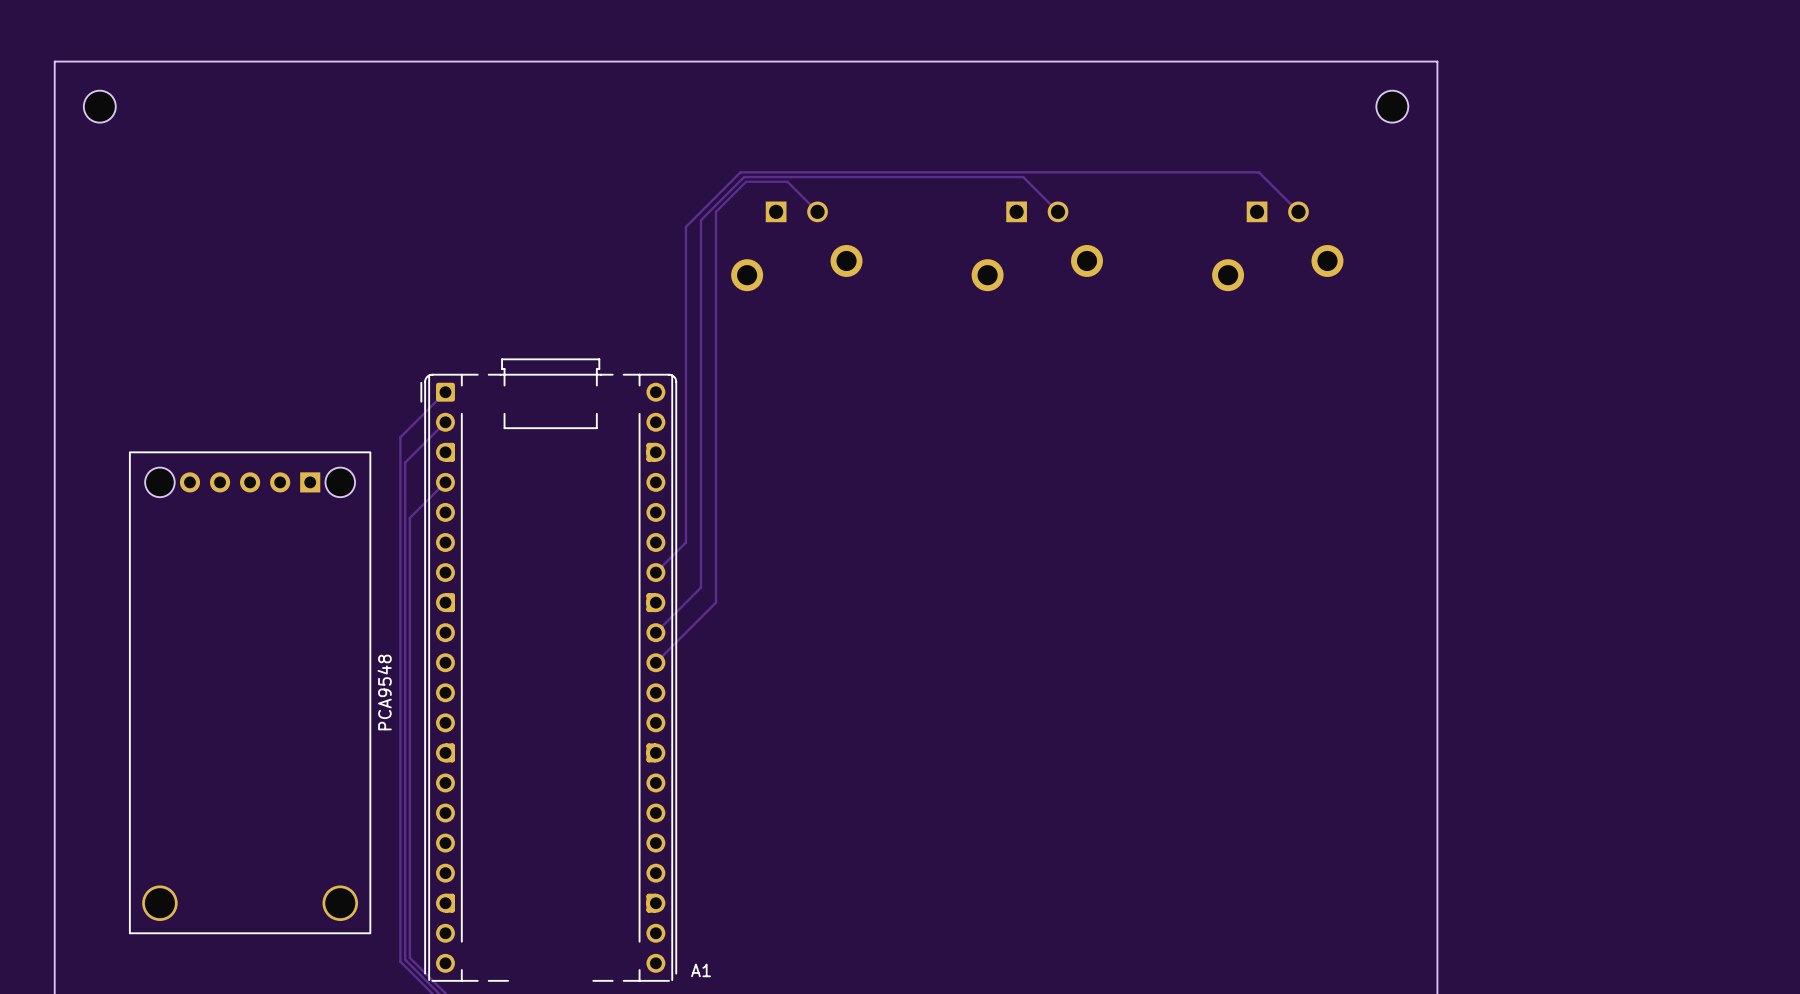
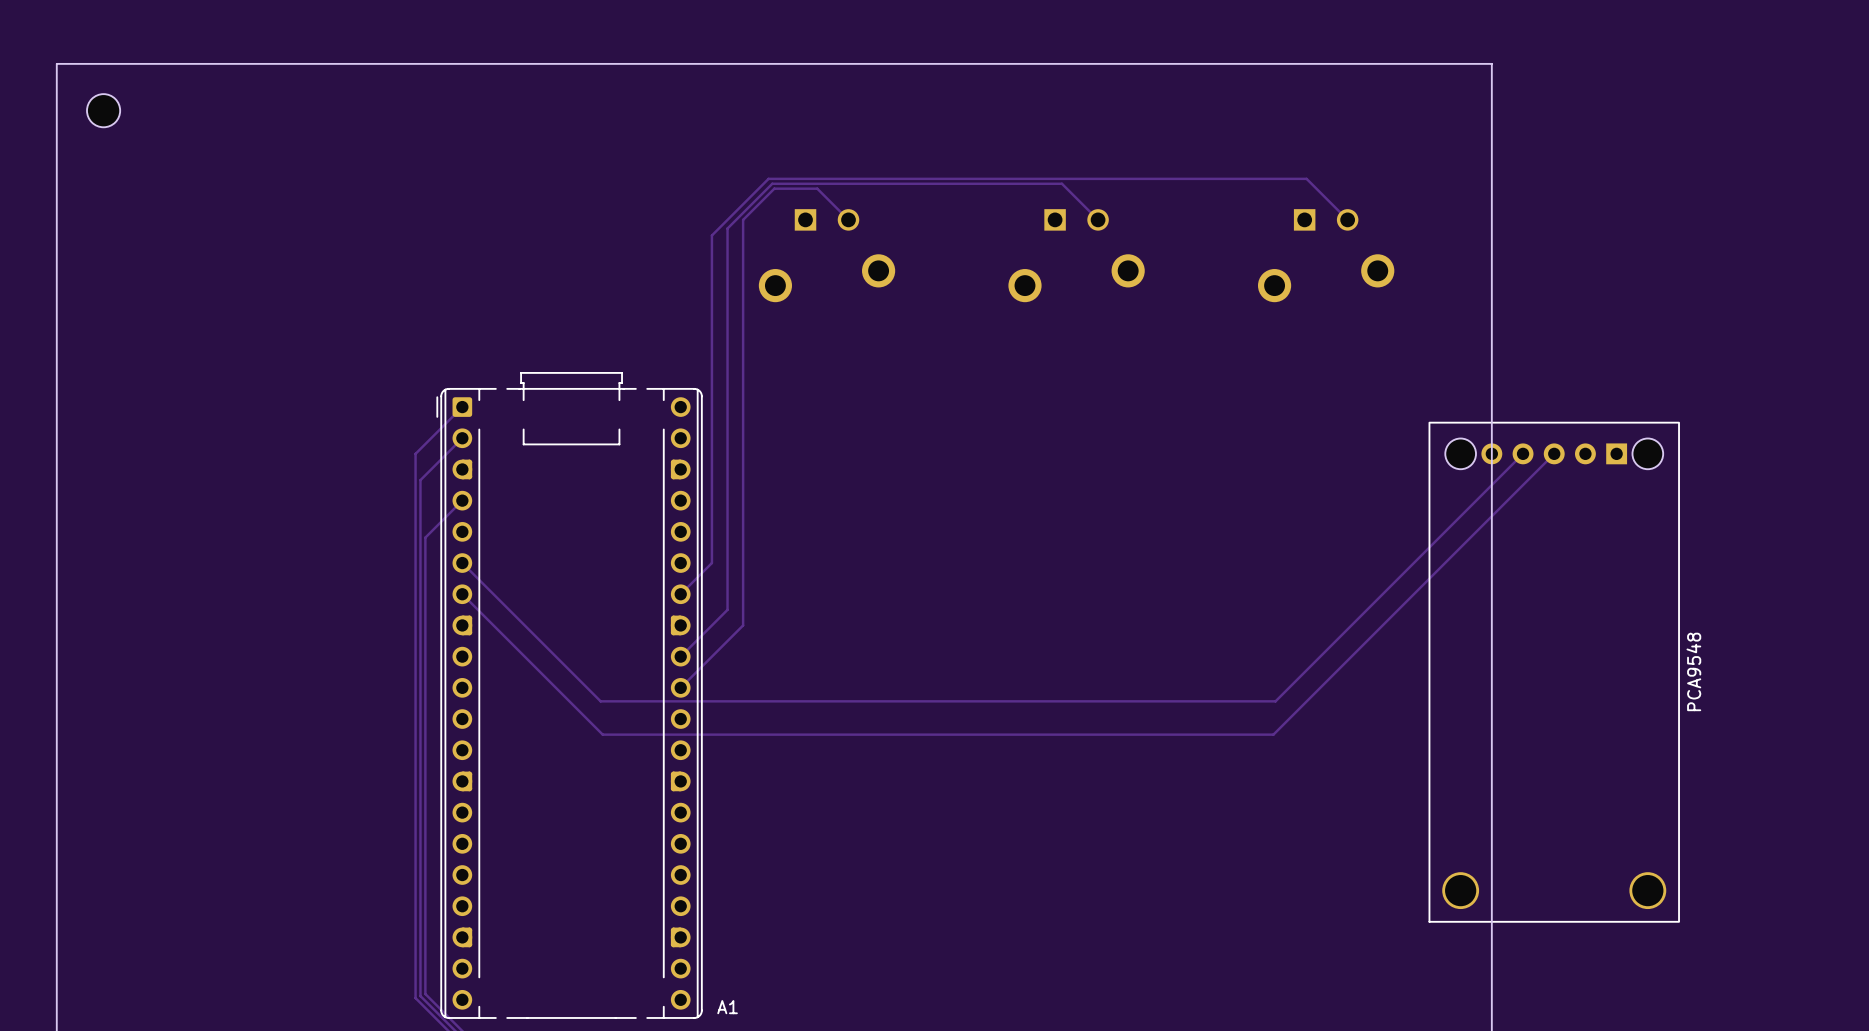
part: (1392, 106) -> none
A1 footprint: [420, 358, 677, 982] -> [436, 372, 703, 1019]
track: none -> (1523, 453) (1275, 701) (600, 701) (462, 563)
track: none -> (1554, 453) (1273, 734) (602, 734) (462, 594)
PCA9548 position: (250, 692) -> (1554, 672)

